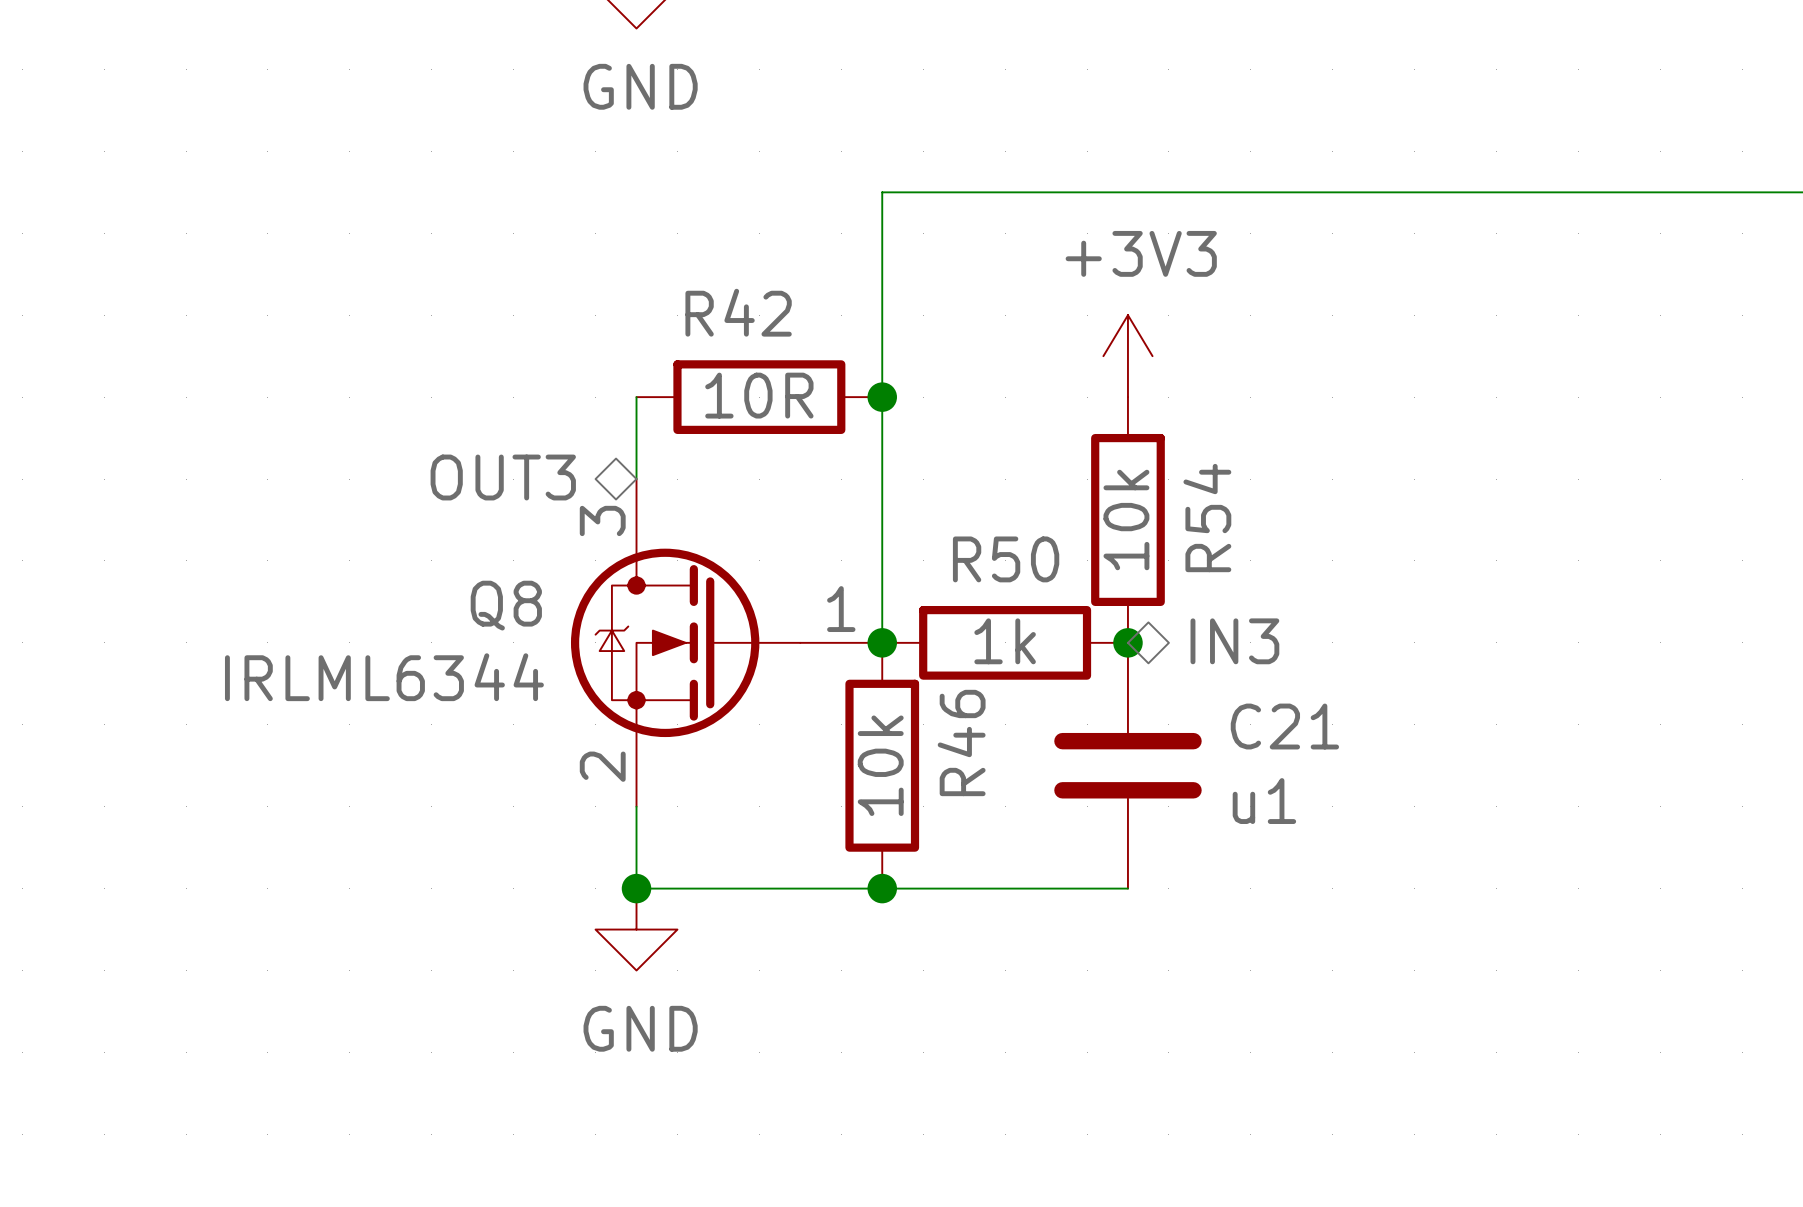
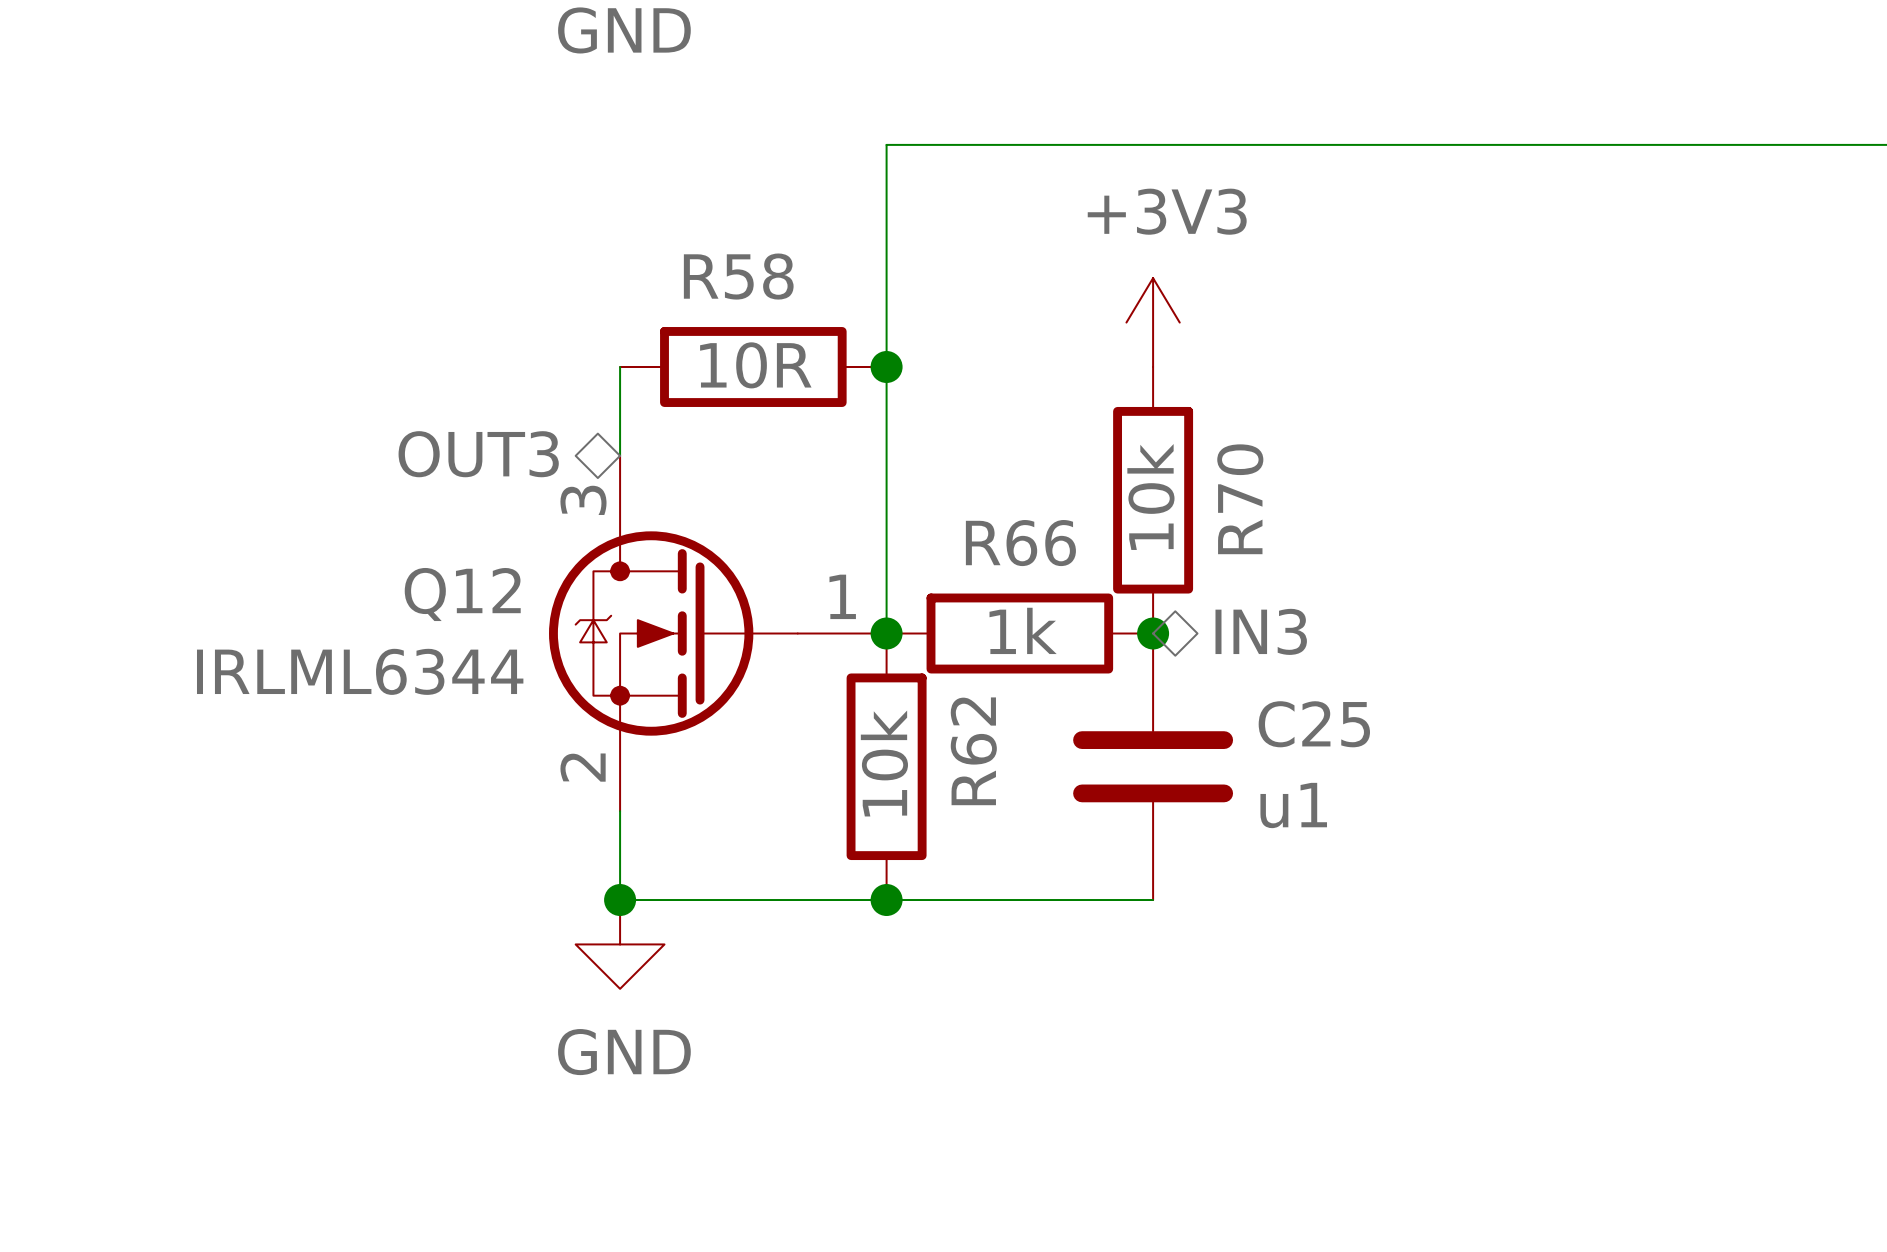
R42 name: R42 (738, 312) -> R58 (738, 276)
R54 name: R54 (1207, 518) -> R70 (1240, 499)
R50 name: R50 (1006, 559) -> R66 (1020, 543)
Q8 name: Q8 (506, 605) -> Q12 (462, 594)
C21 name: C21 (1284, 726) -> C25 (1314, 724)
R46 name: R46 (961, 742) -> R62 (973, 751)

